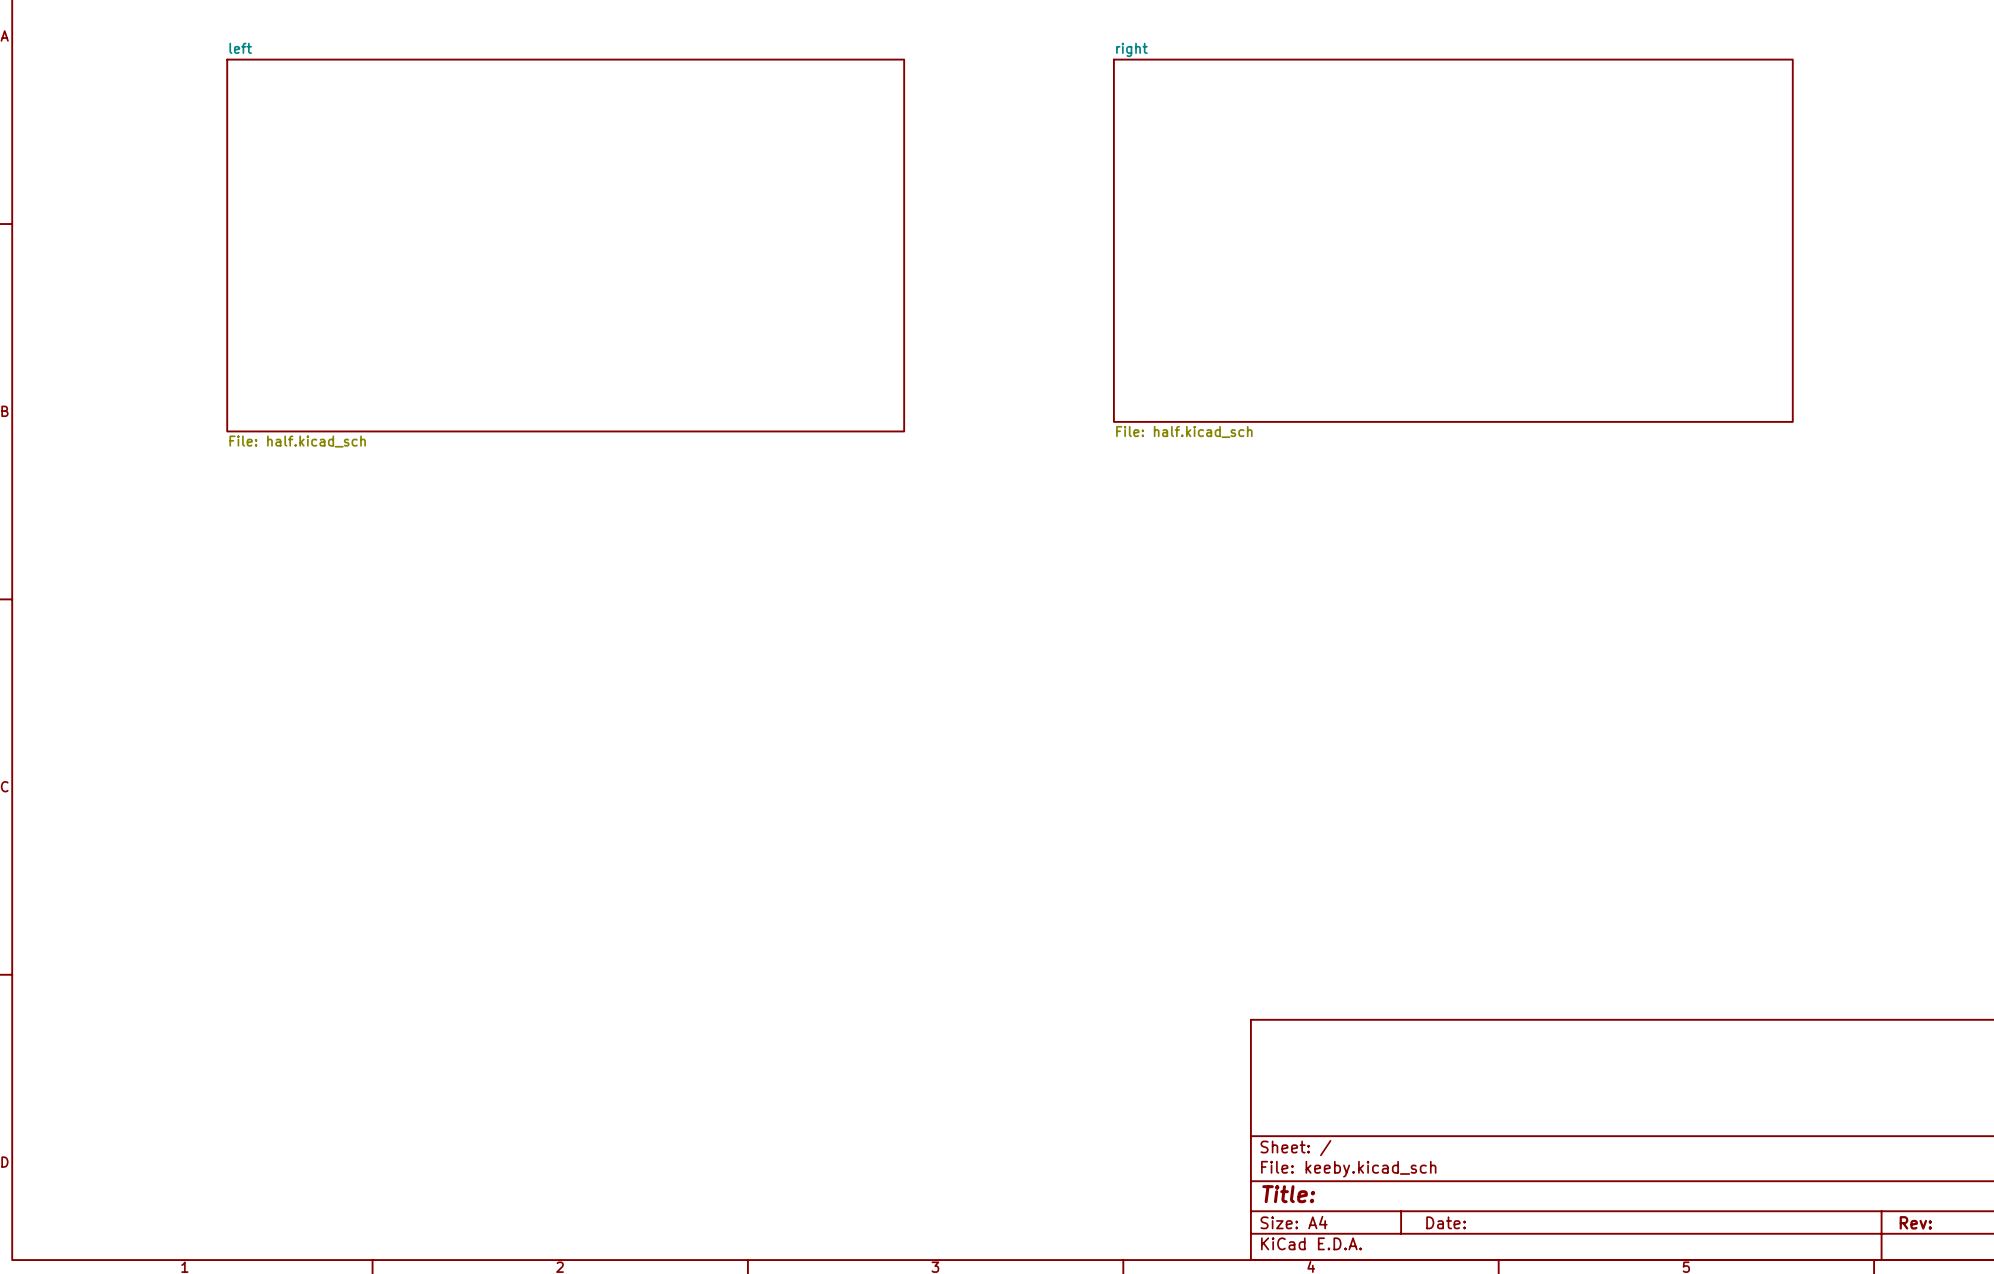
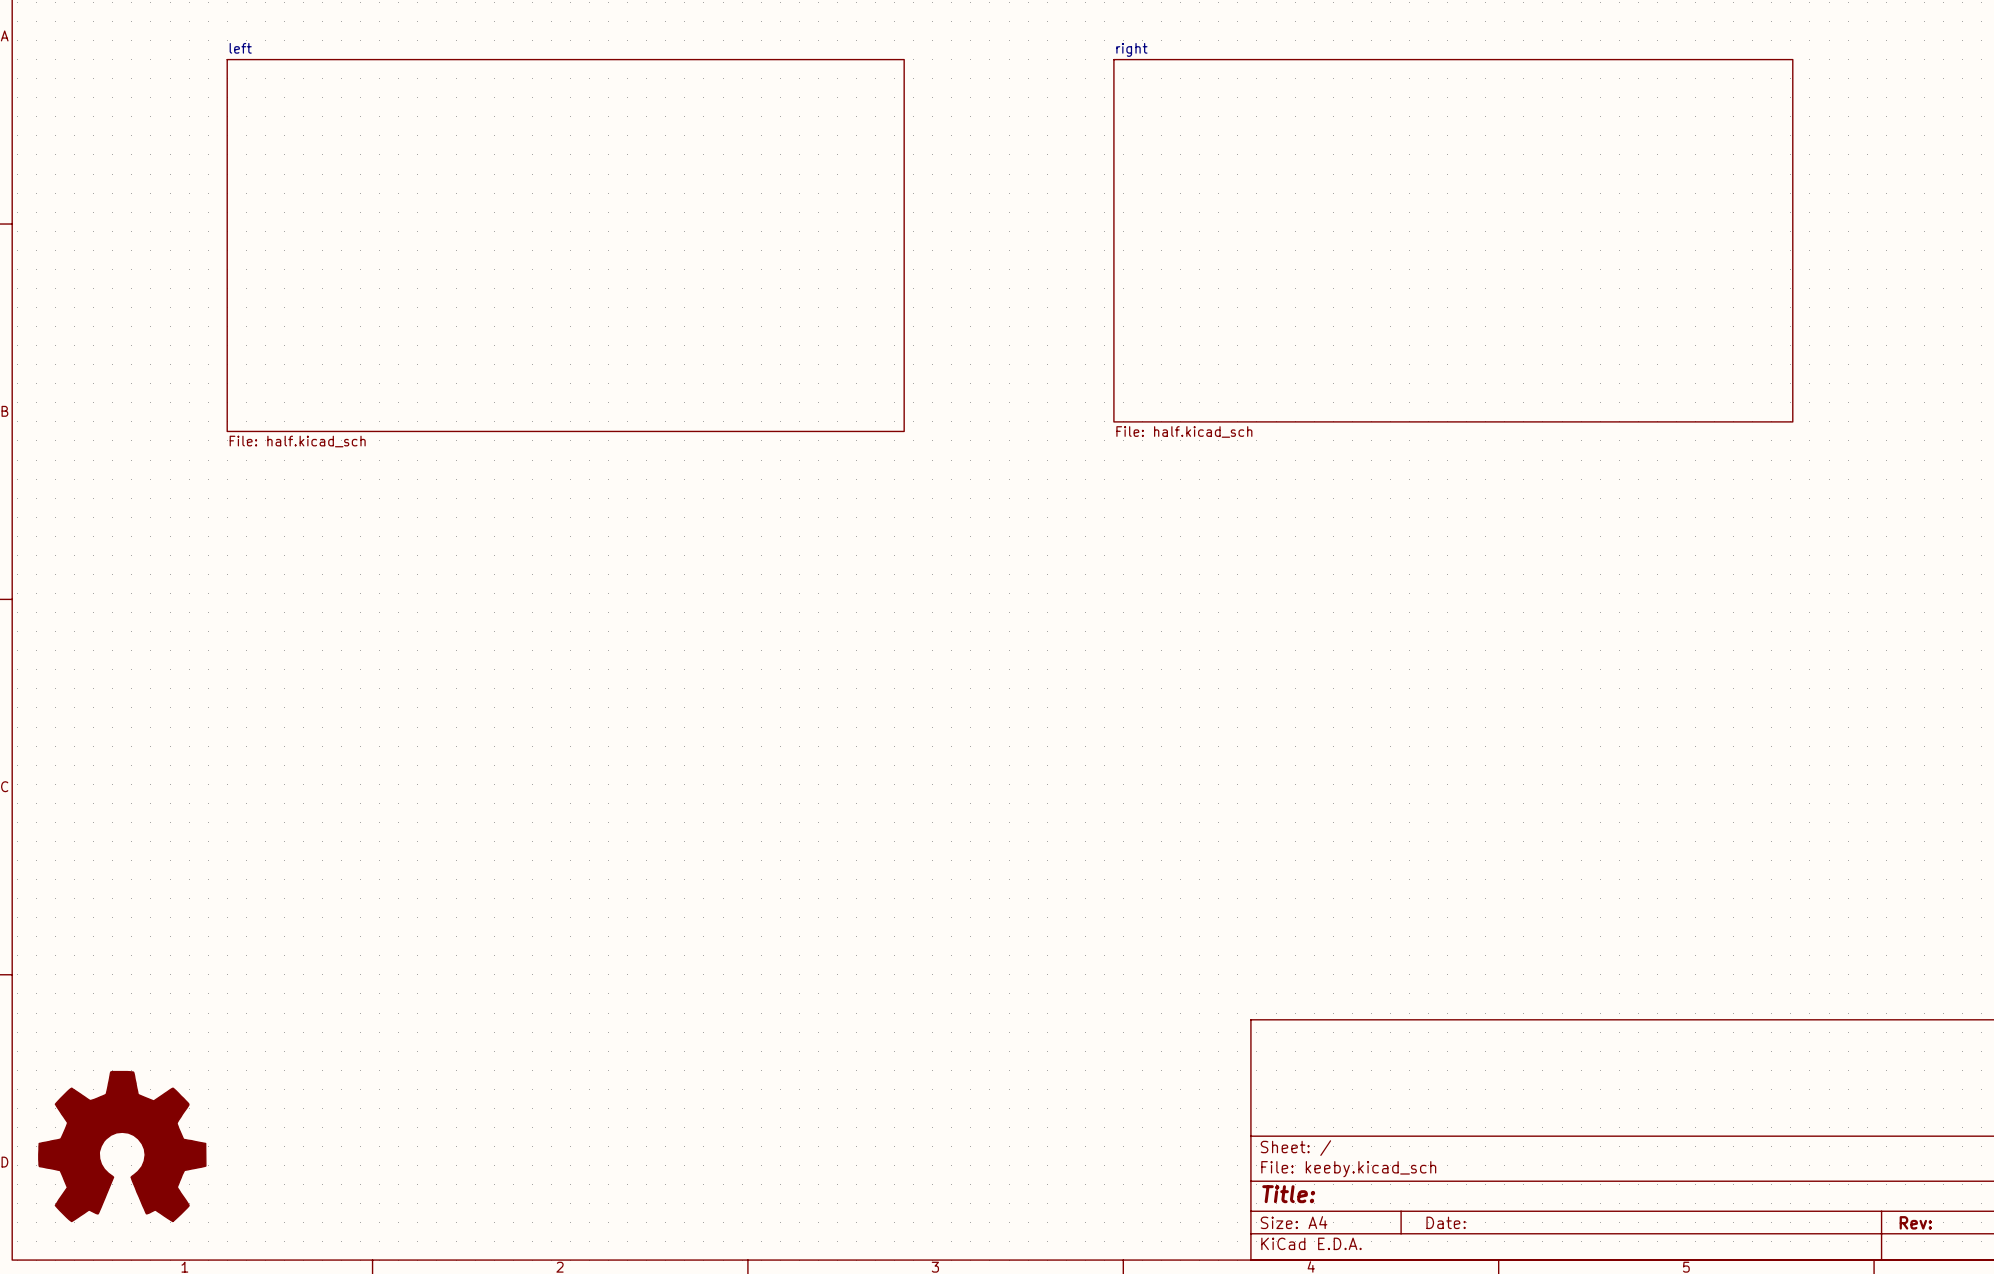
power symbol: none -> (122, 1146)

